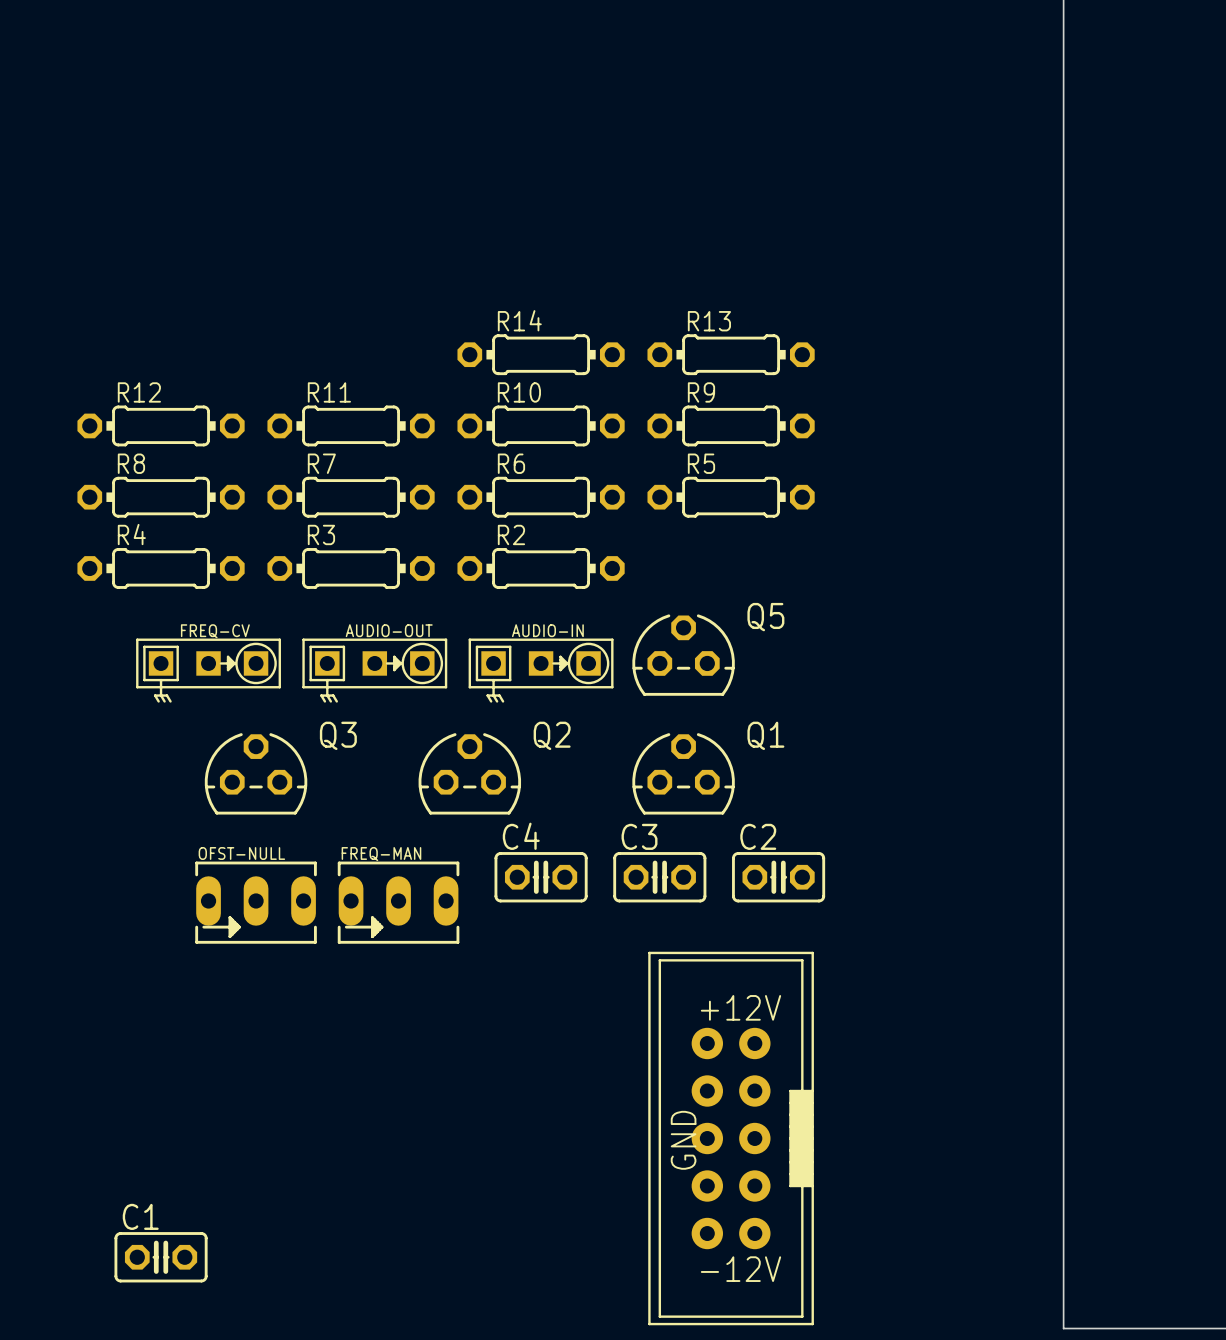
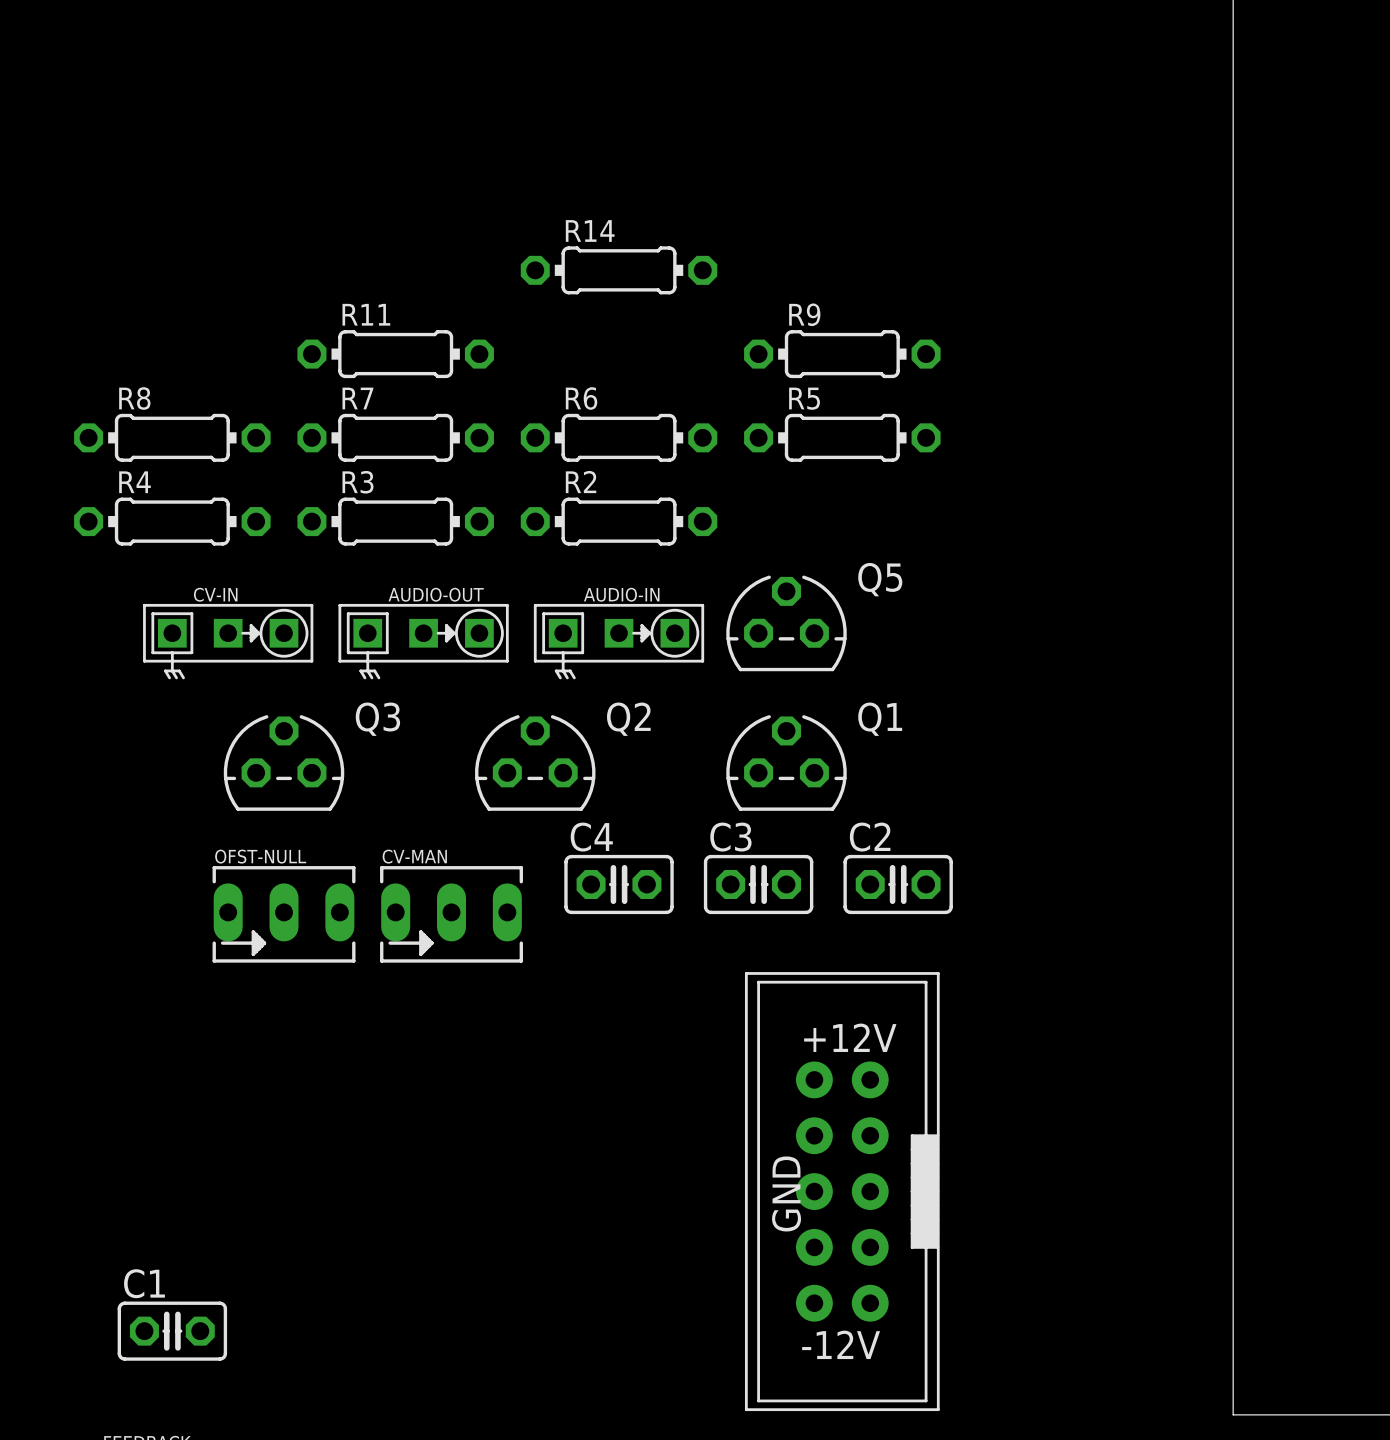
R13: (731, 354) -> none
R12: (161, 425) -> none
R10: (541, 425) -> none
FREQ-CV name: FREQ-CV (215, 631) -> CV-IN (215, 594)
FREQ-MAN name: FREQ-MAN (381, 854) -> CV-MAN (414, 856)

